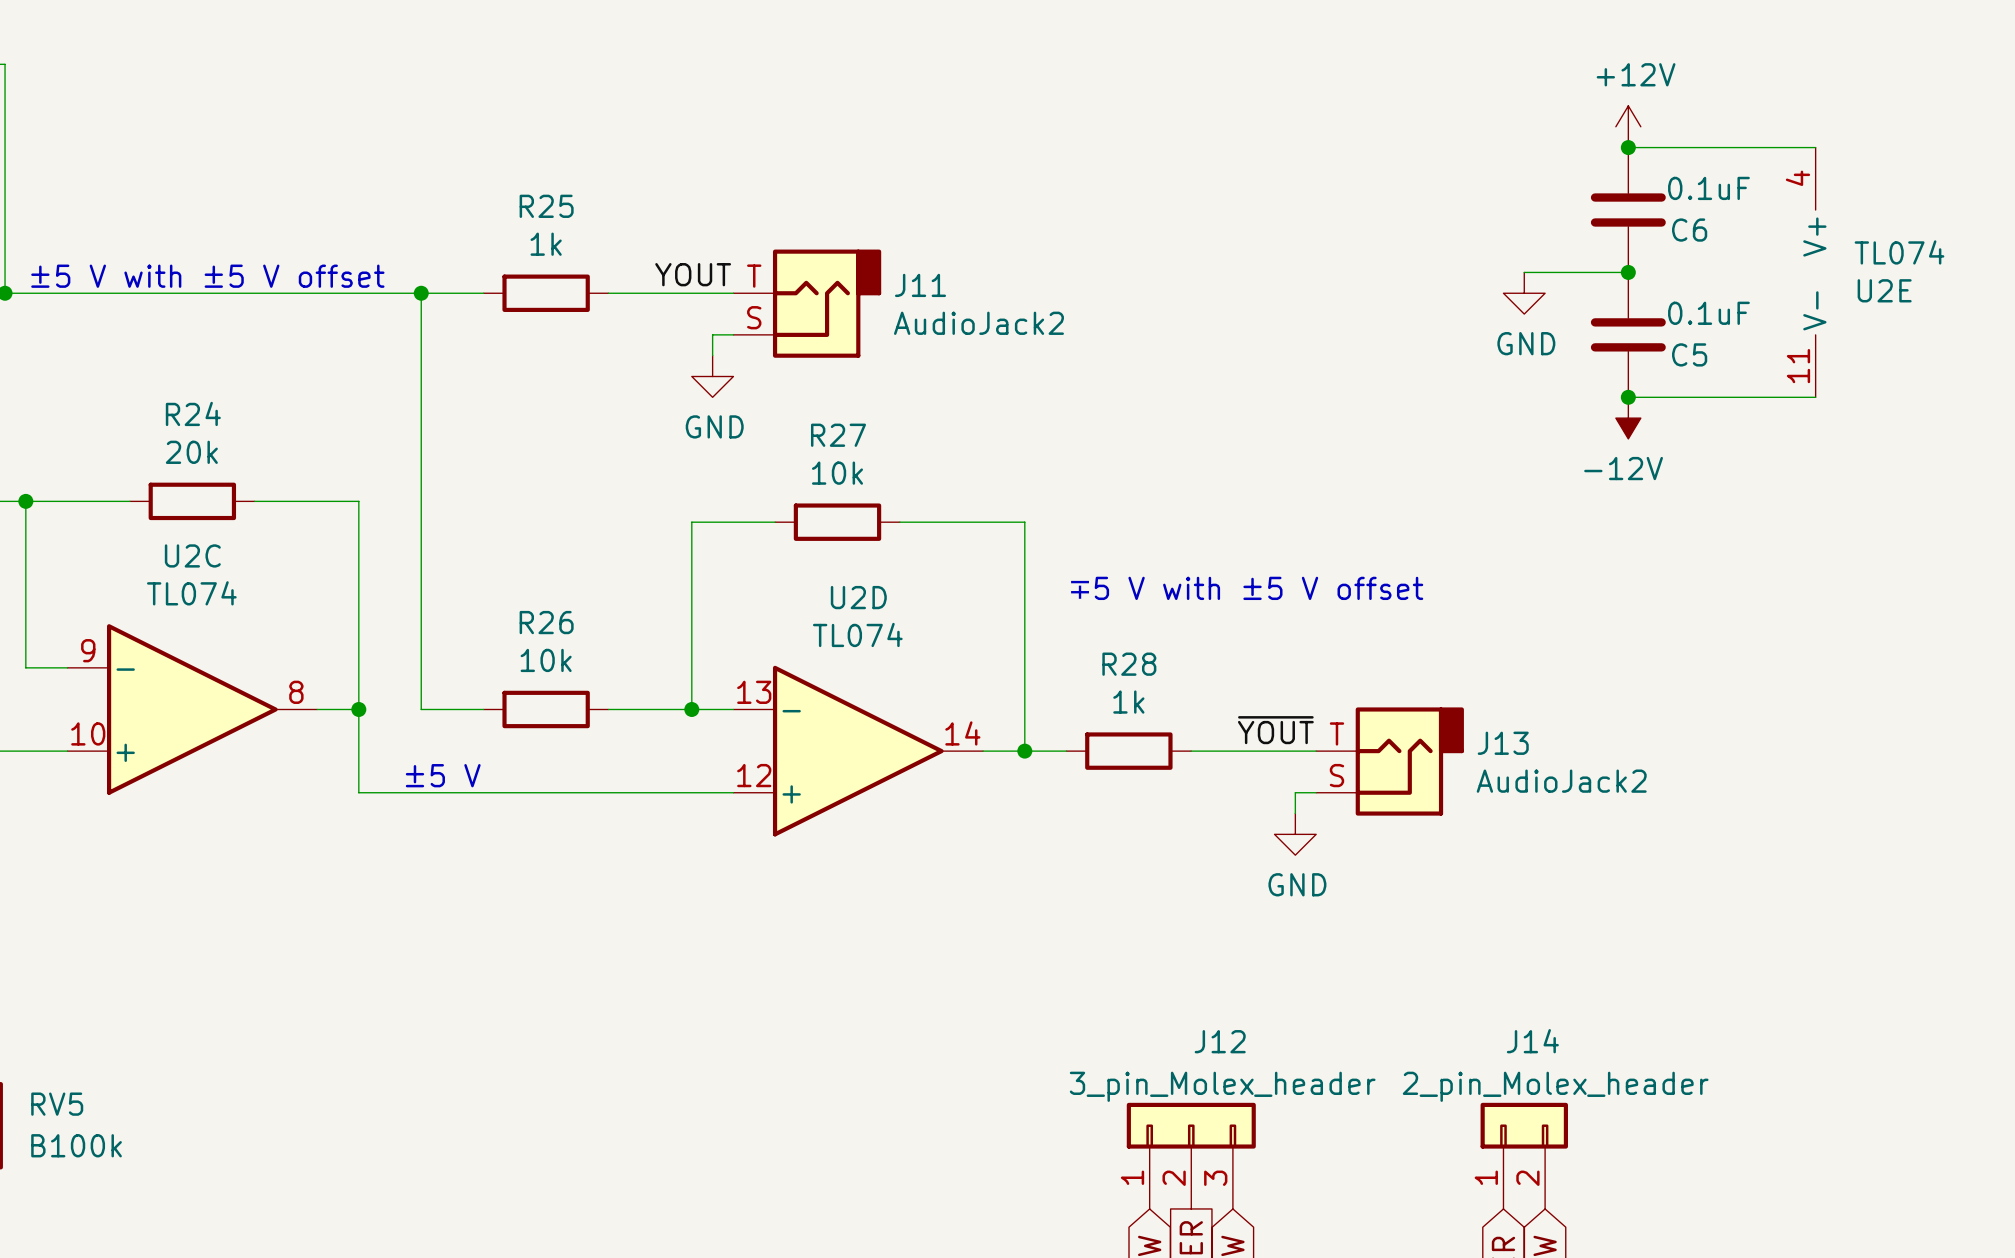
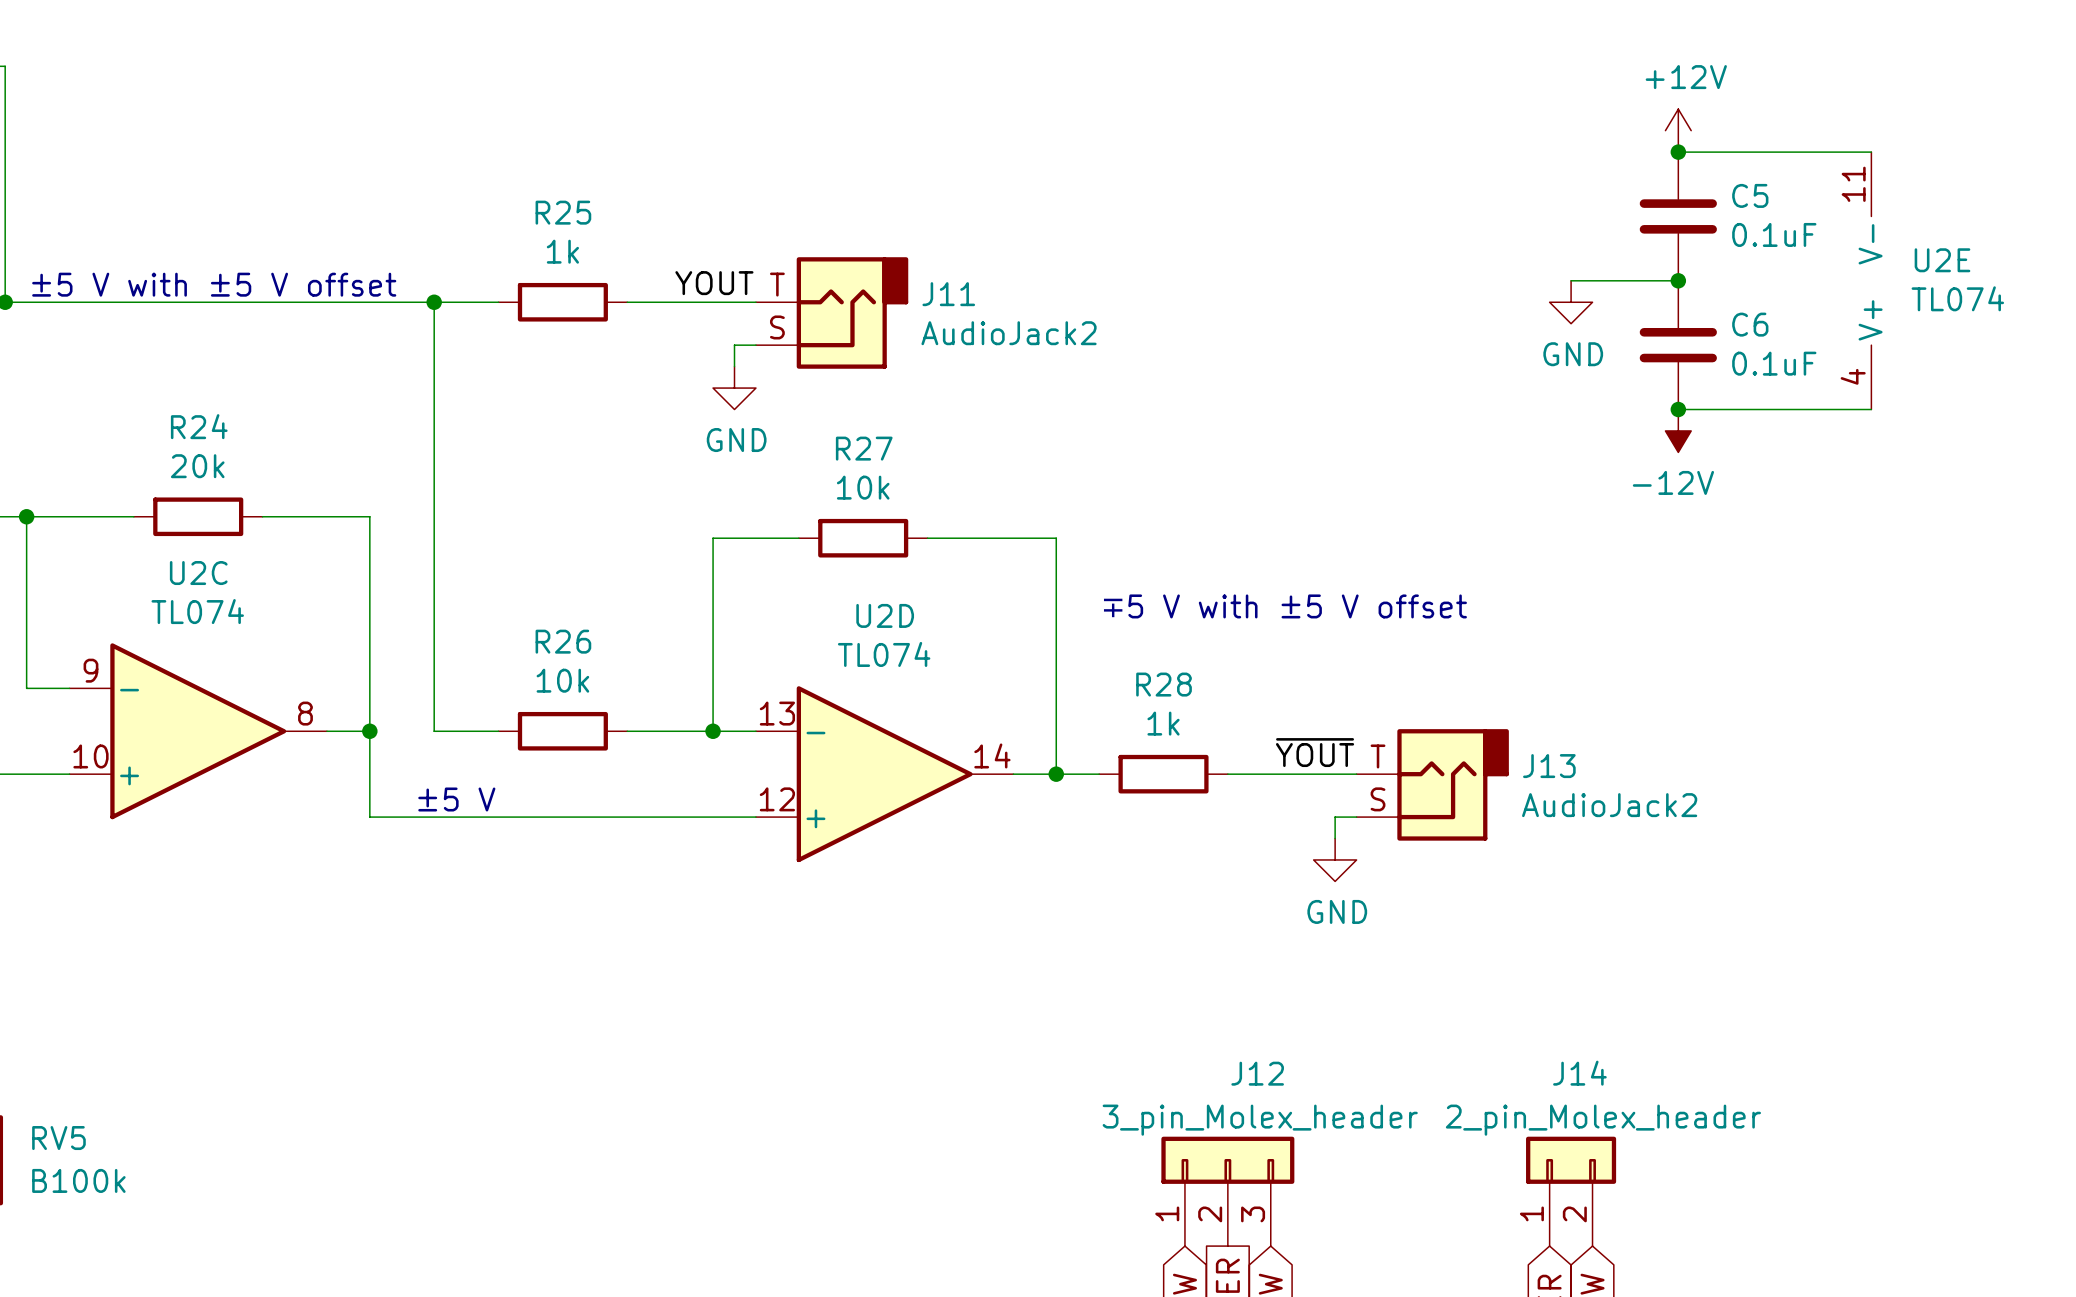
C6 value position: 0.1uF (1708, 188) -> 0.1uF (1774, 234)
C6 name: C6 (1689, 230) -> C5 (1750, 195)
U2E value position: TL074 (1899, 252) -> TL074 (1957, 298)
U2E rotation: 0° (1815, 272) -> 180° (1871, 280)
U2E name position: U2E (1884, 290) -> U2E (1942, 260)
C5 value position: 0.1uF (1708, 313) -> 0.1uF (1774, 363)
C5 name: C5 (1689, 354) -> C6 (1750, 324)

